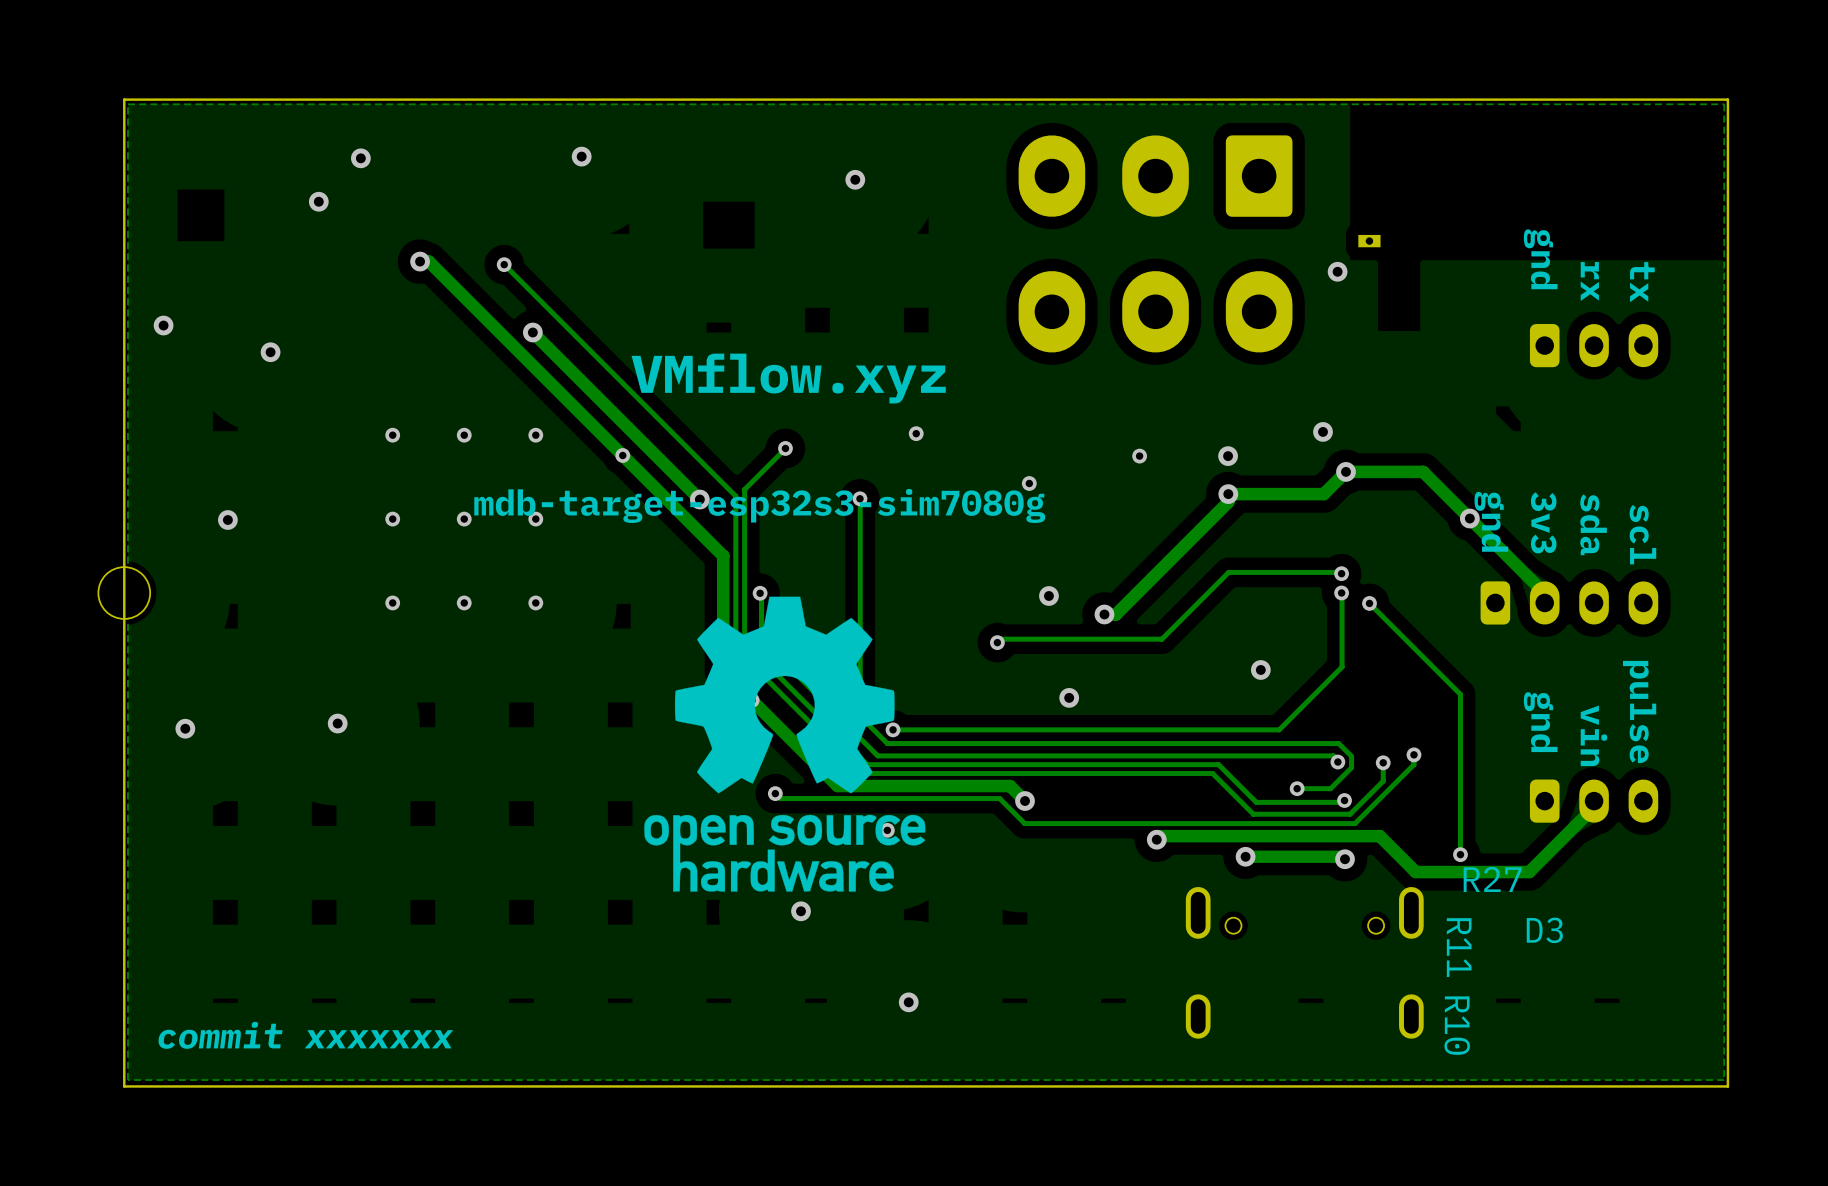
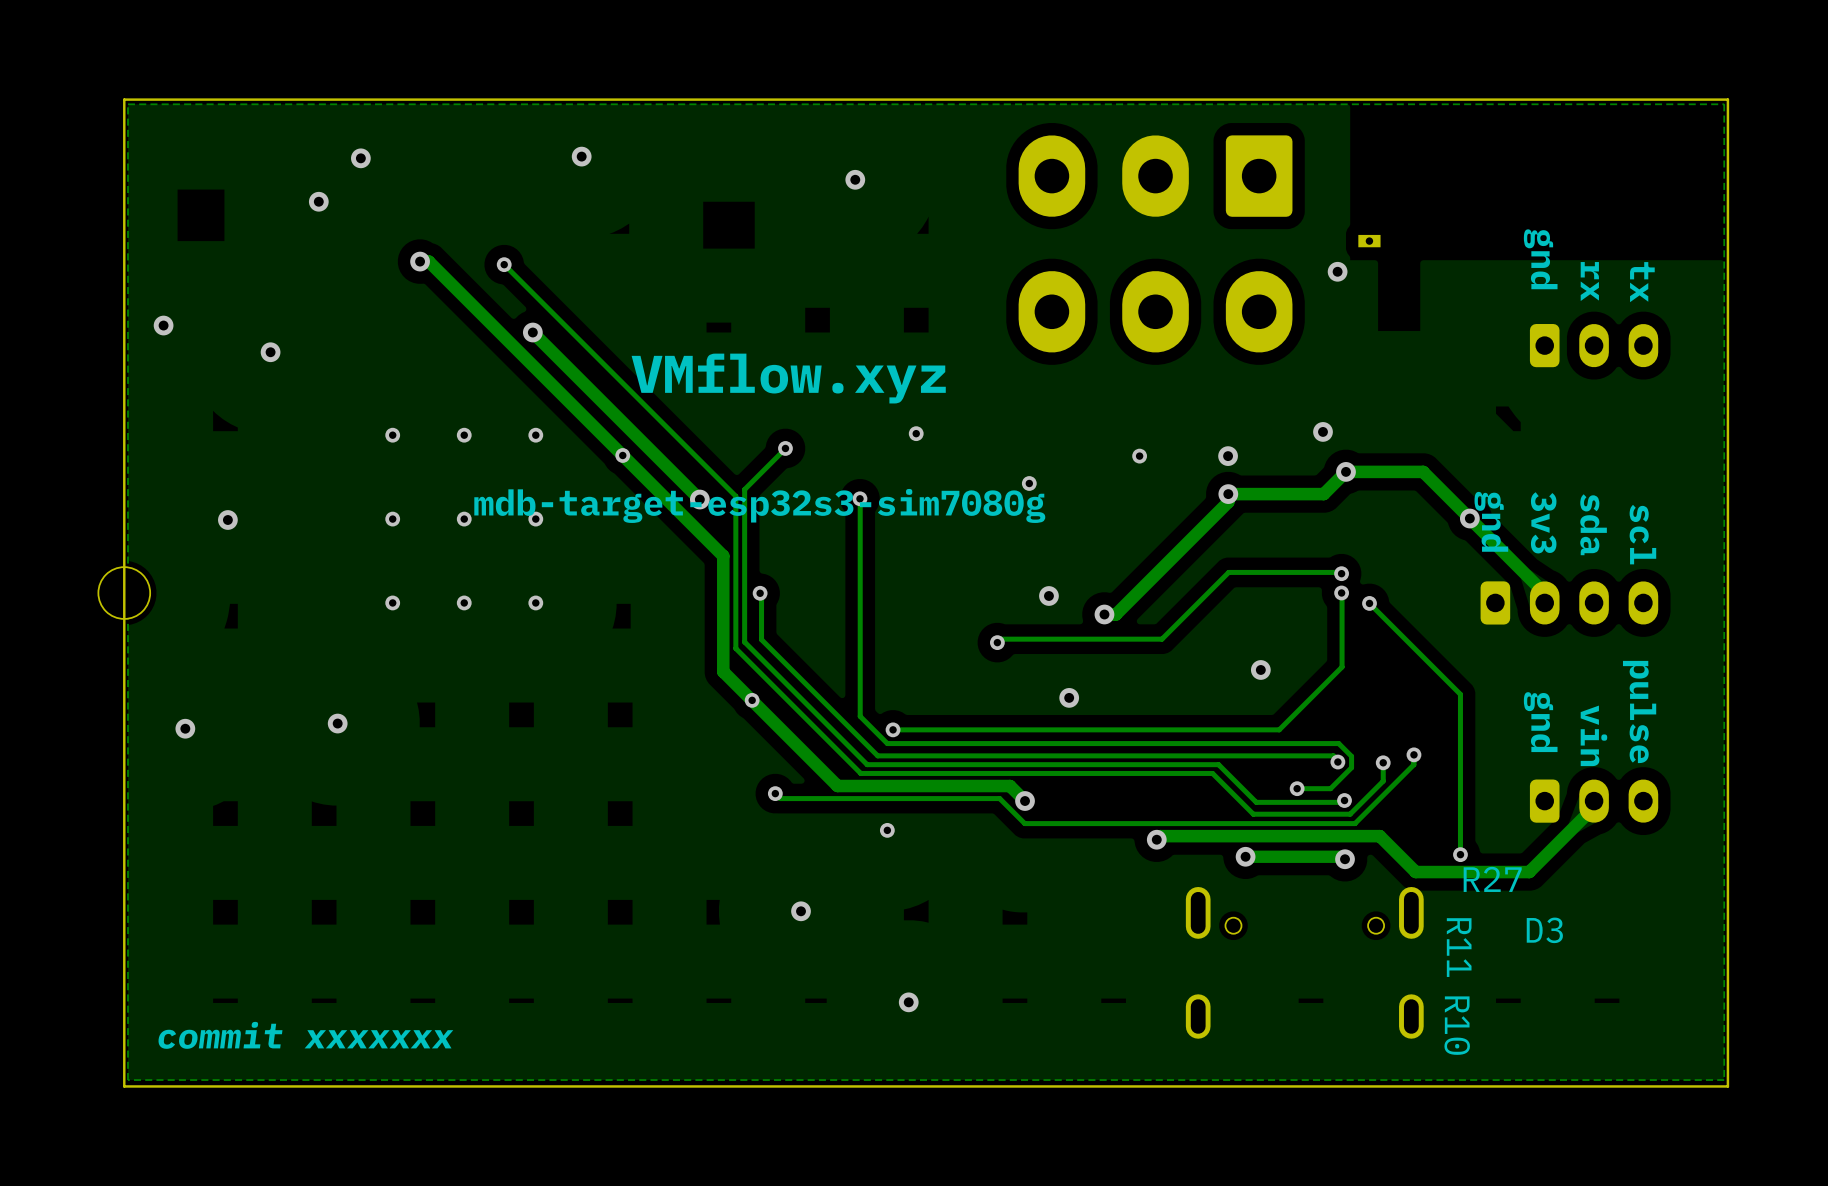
drawing: [644, 596, 926, 892] -> none

